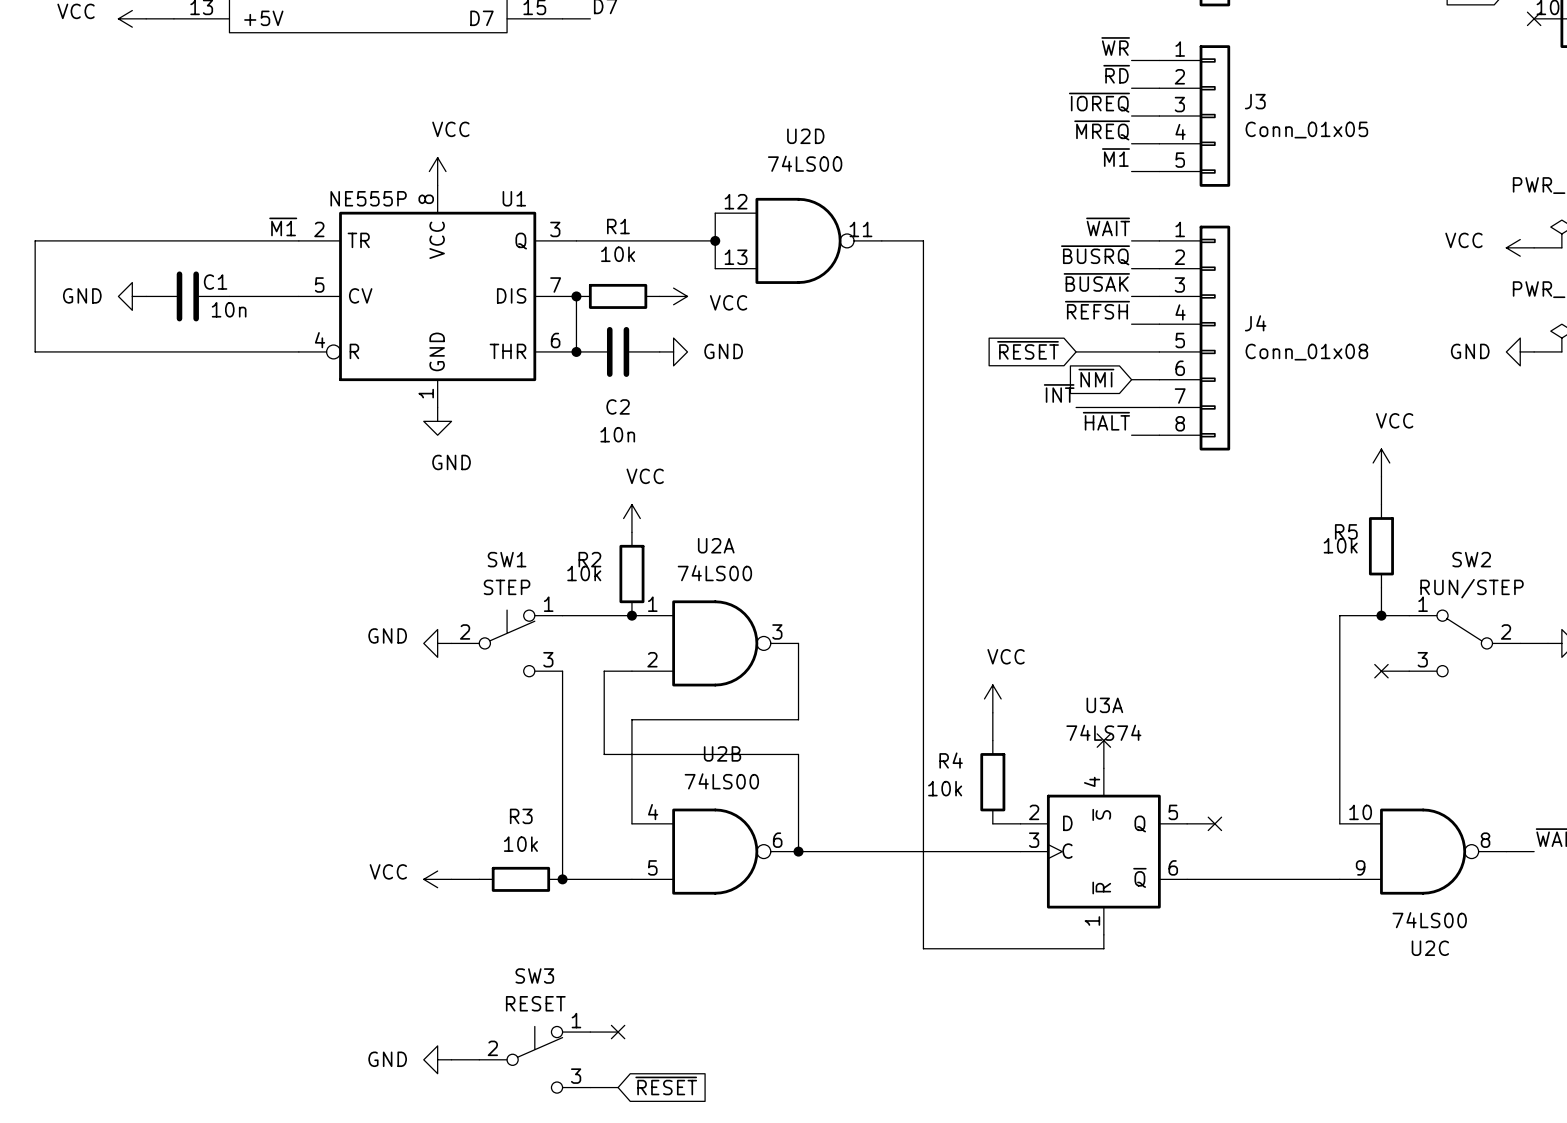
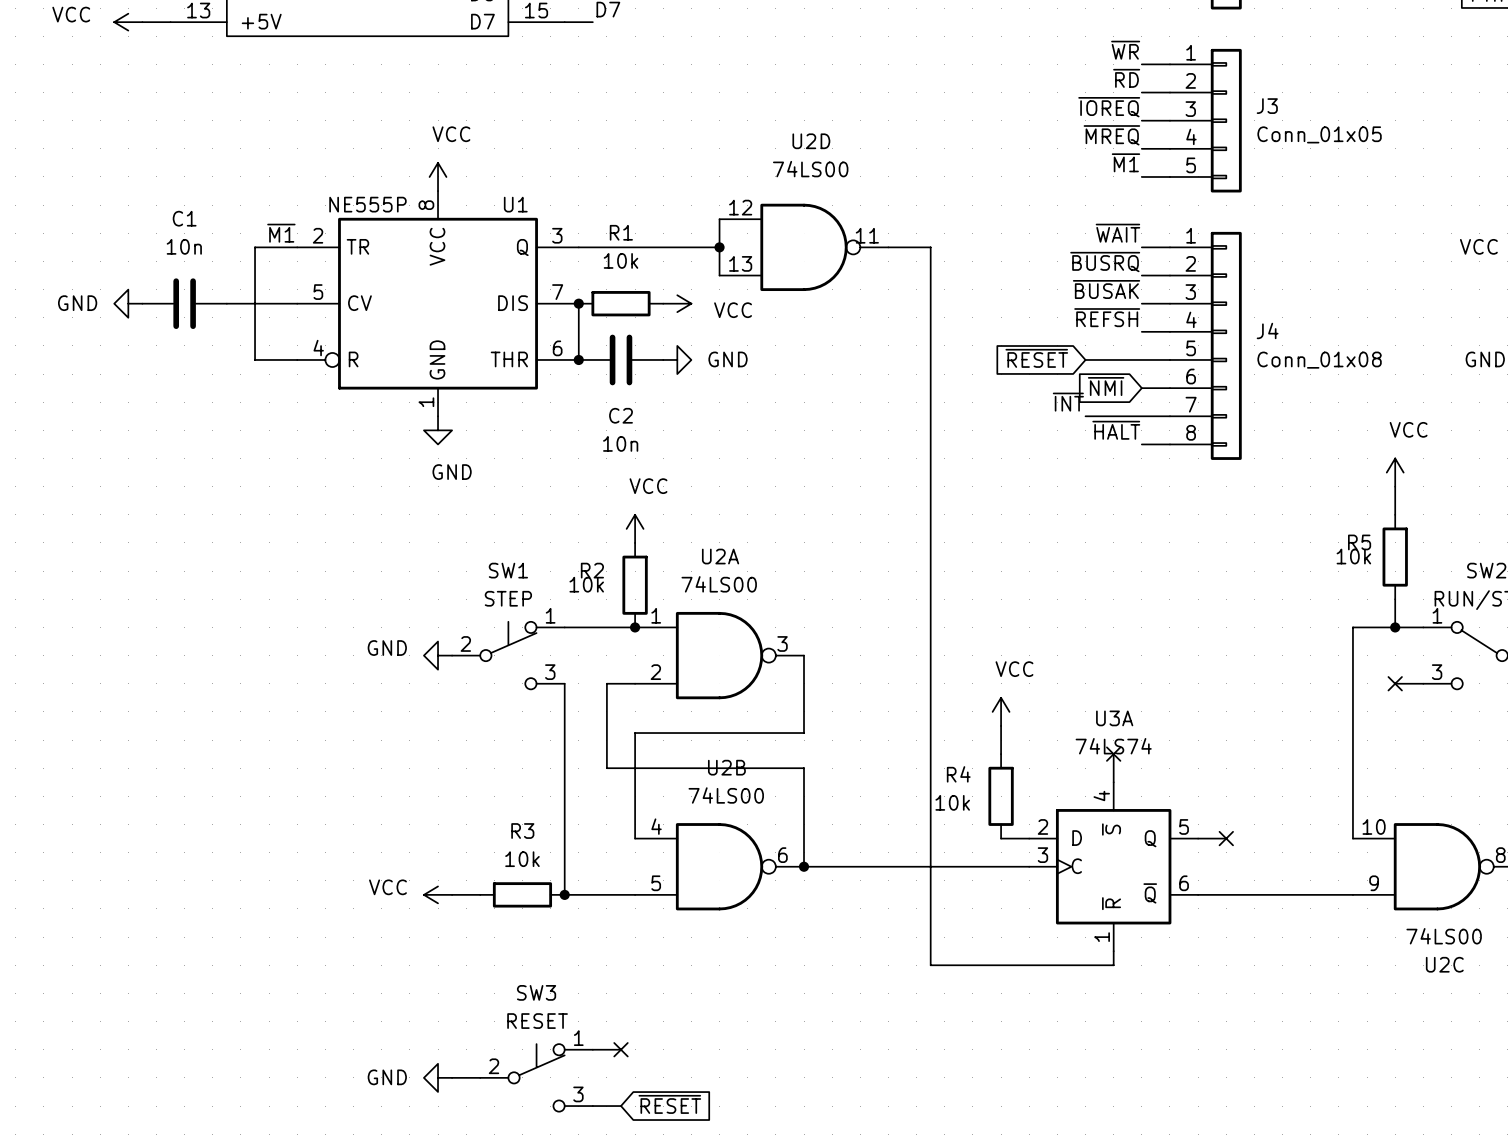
wire: (257, 240) (35, 240) (35, 351) (257, 351) -> (255, 247) (255, 359)
C1 name position: C1 (215, 282) -> C1 (184, 218)
C1 value position: 10n (229, 309) -> 10n (184, 246)

